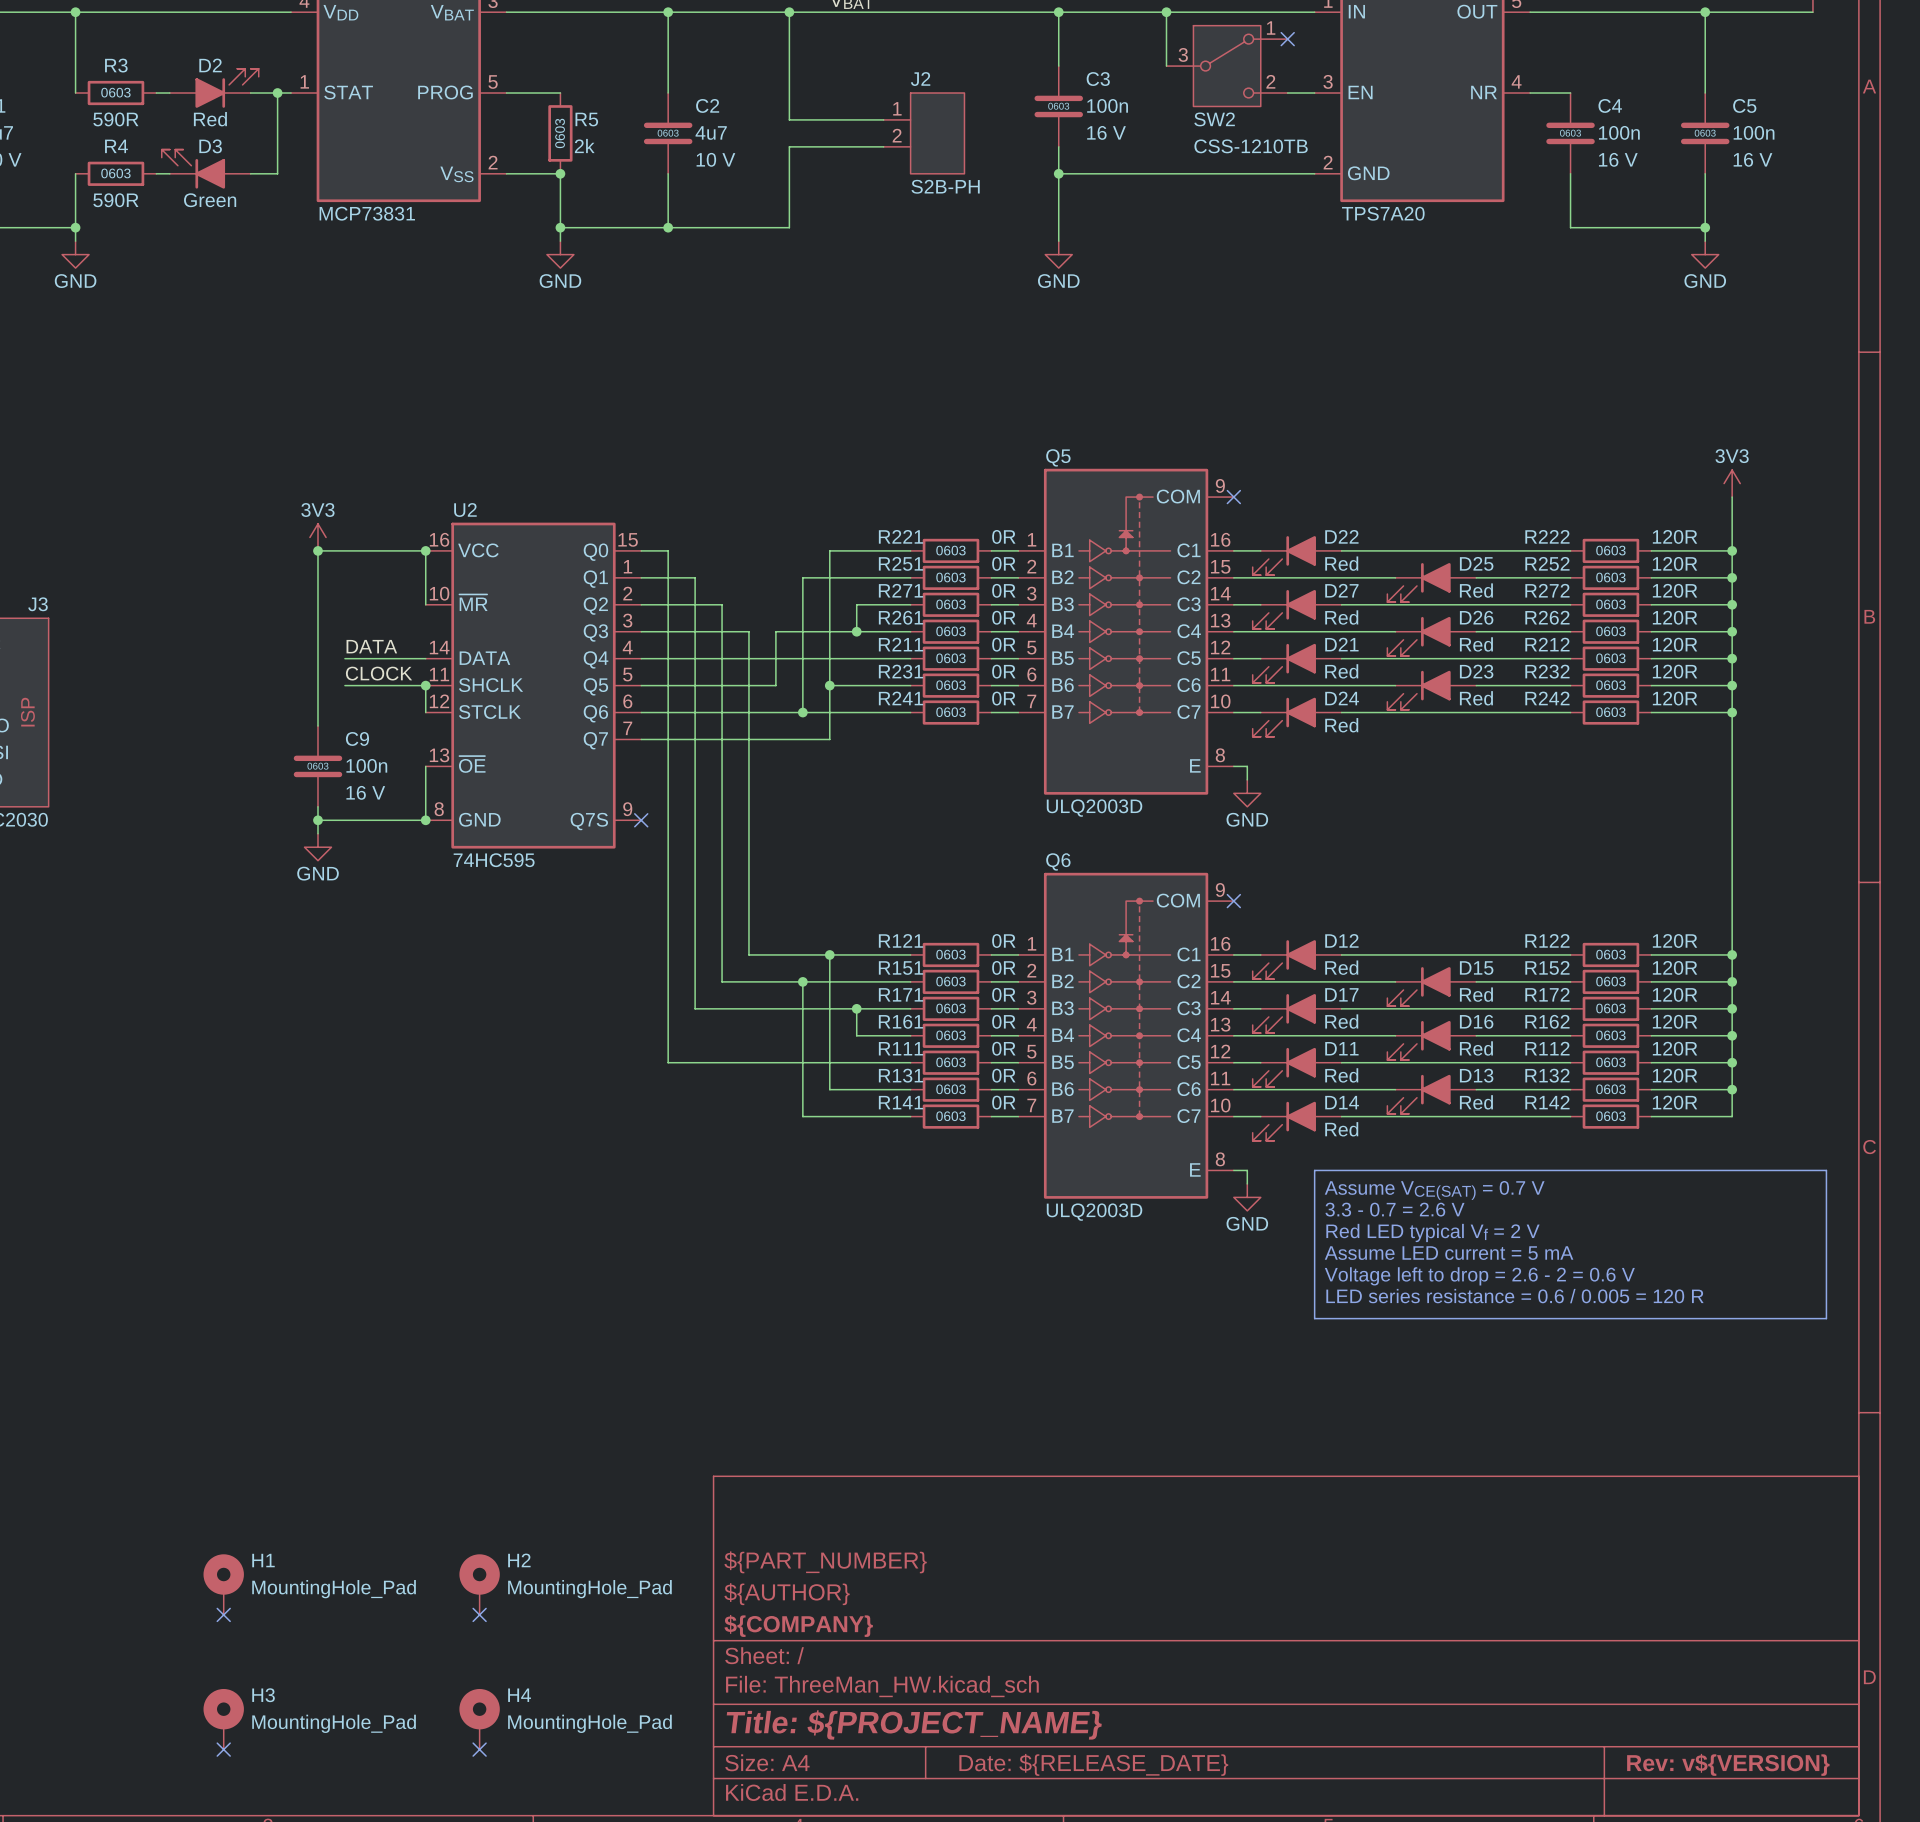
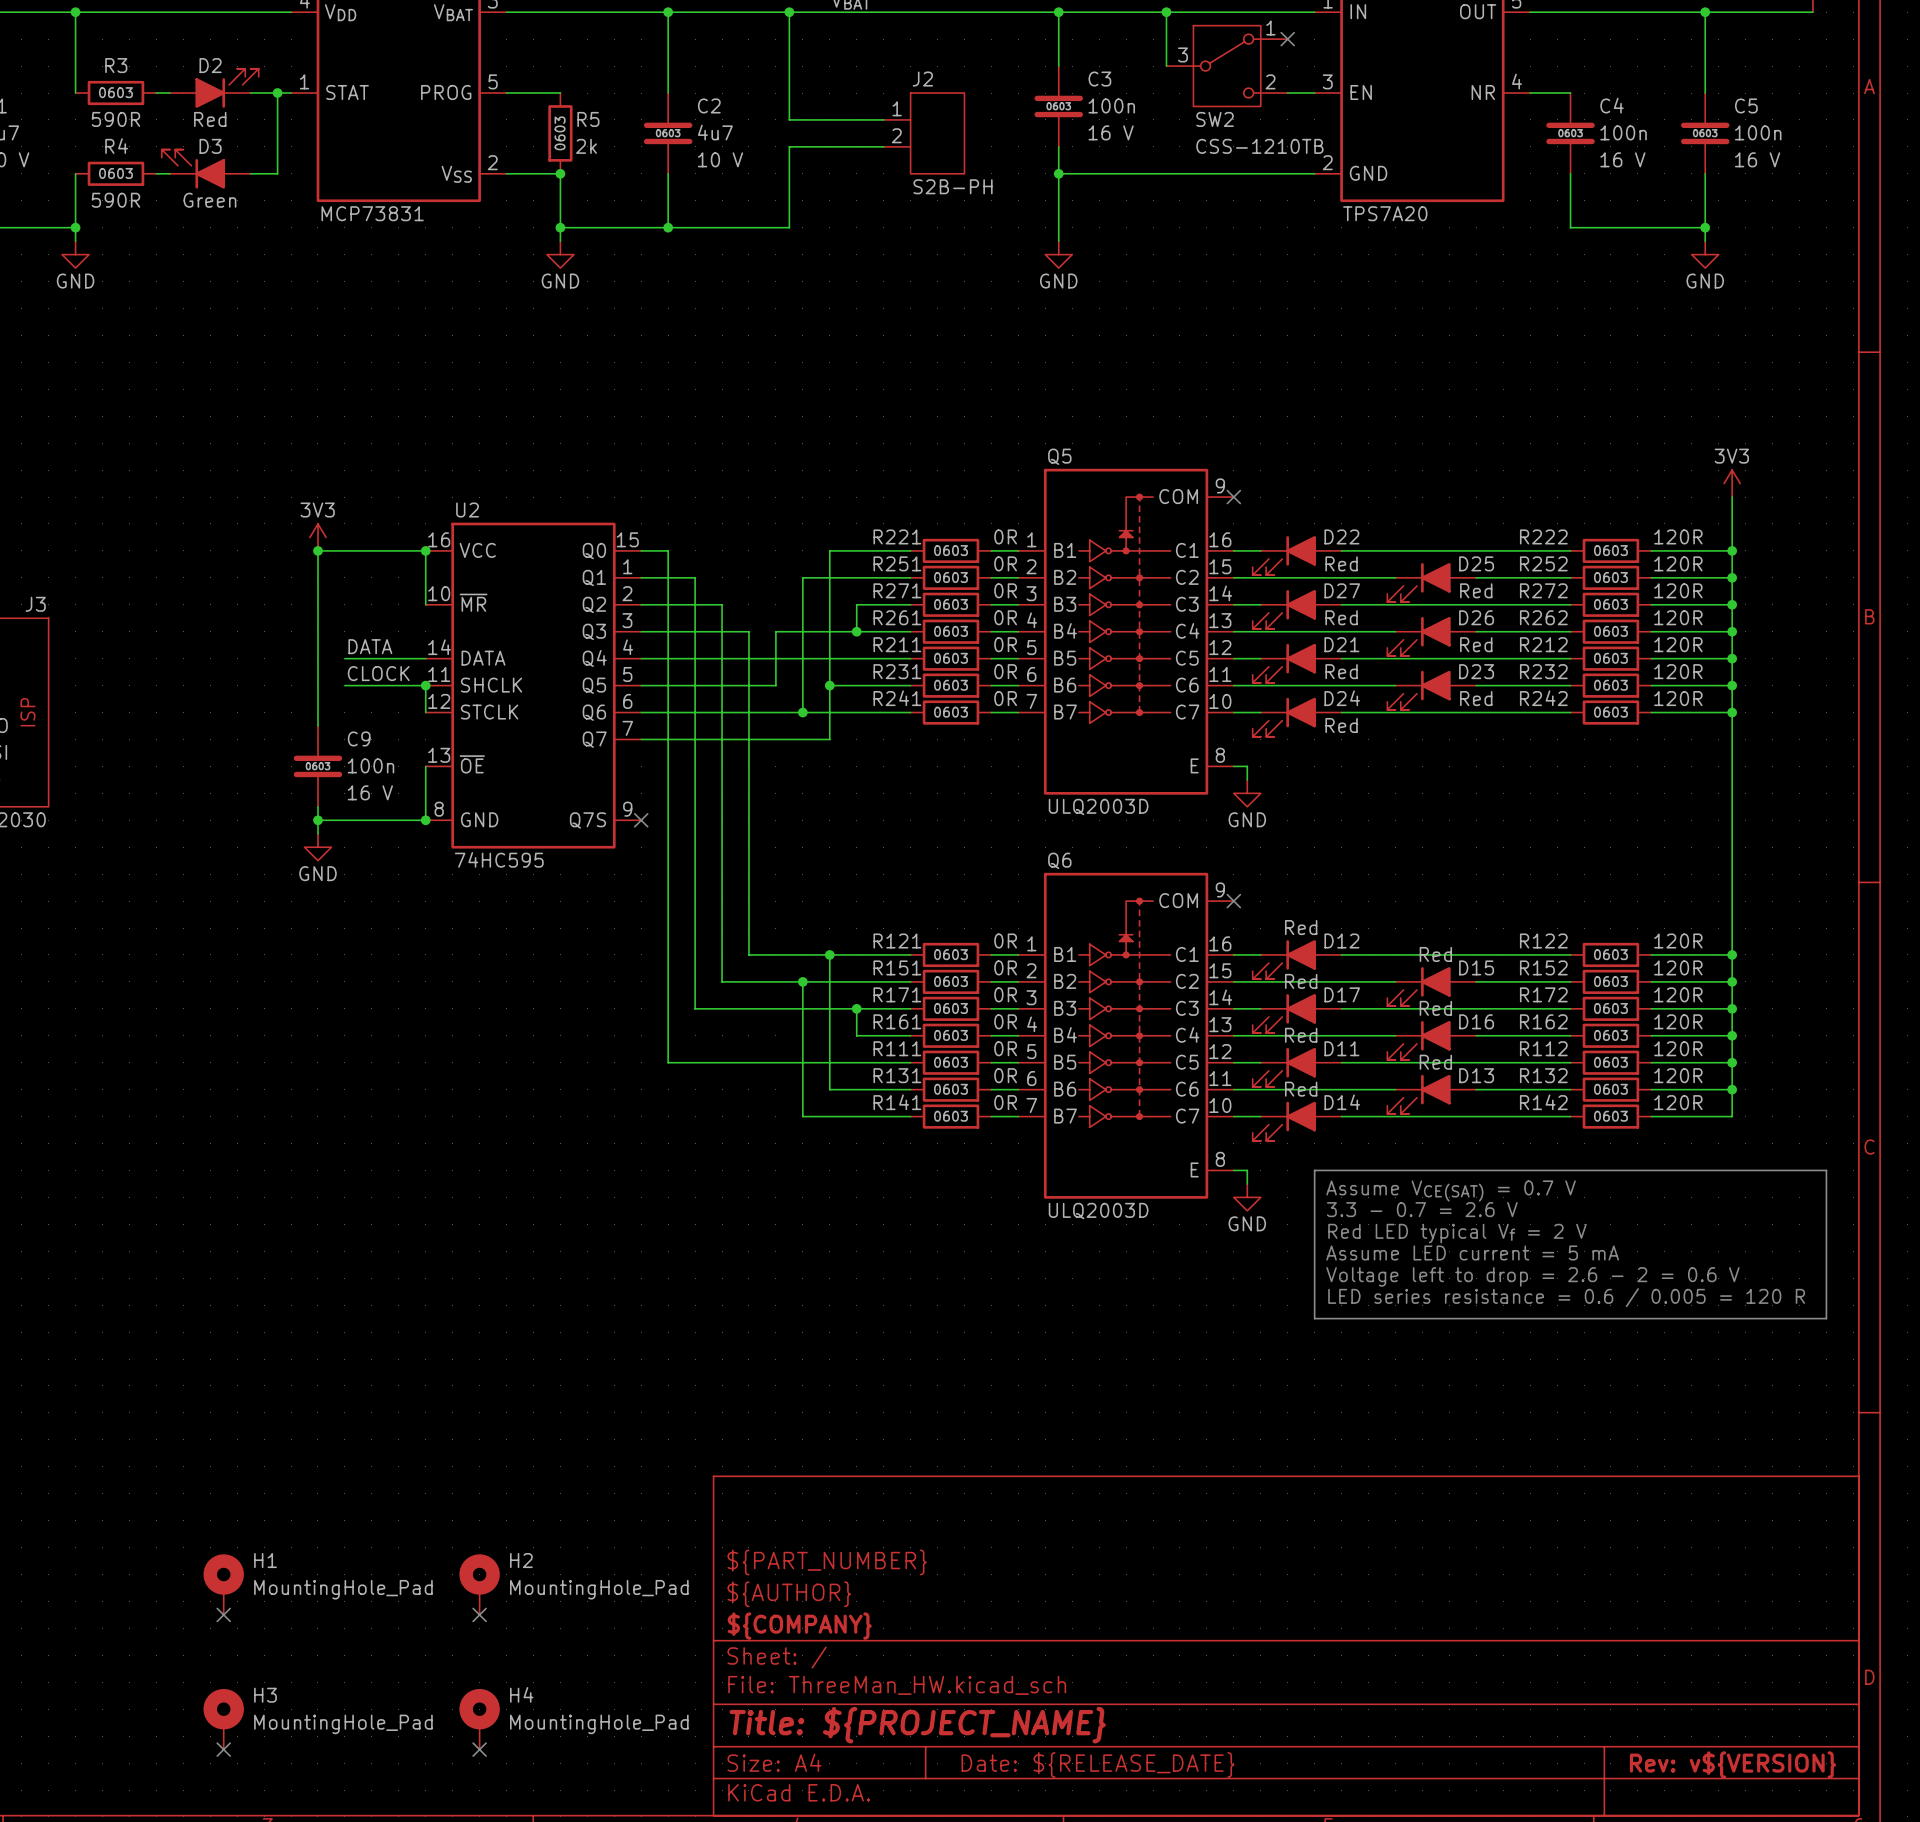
D12 text position: Red (1341, 967) -> Red (1301, 927)
D15 text position: Red (1476, 994) -> Red (1435, 954)
D17 text position: Red (1341, 1021) -> Red (1301, 981)
D16 text position: Red (1476, 1048) -> Red (1435, 1008)
D11 text position: Red (1341, 1075) -> Red (1301, 1035)
D13 text position: Red (1476, 1102) -> Red (1435, 1062)
D14 text position: Red (1341, 1129) -> Red (1301, 1089)

